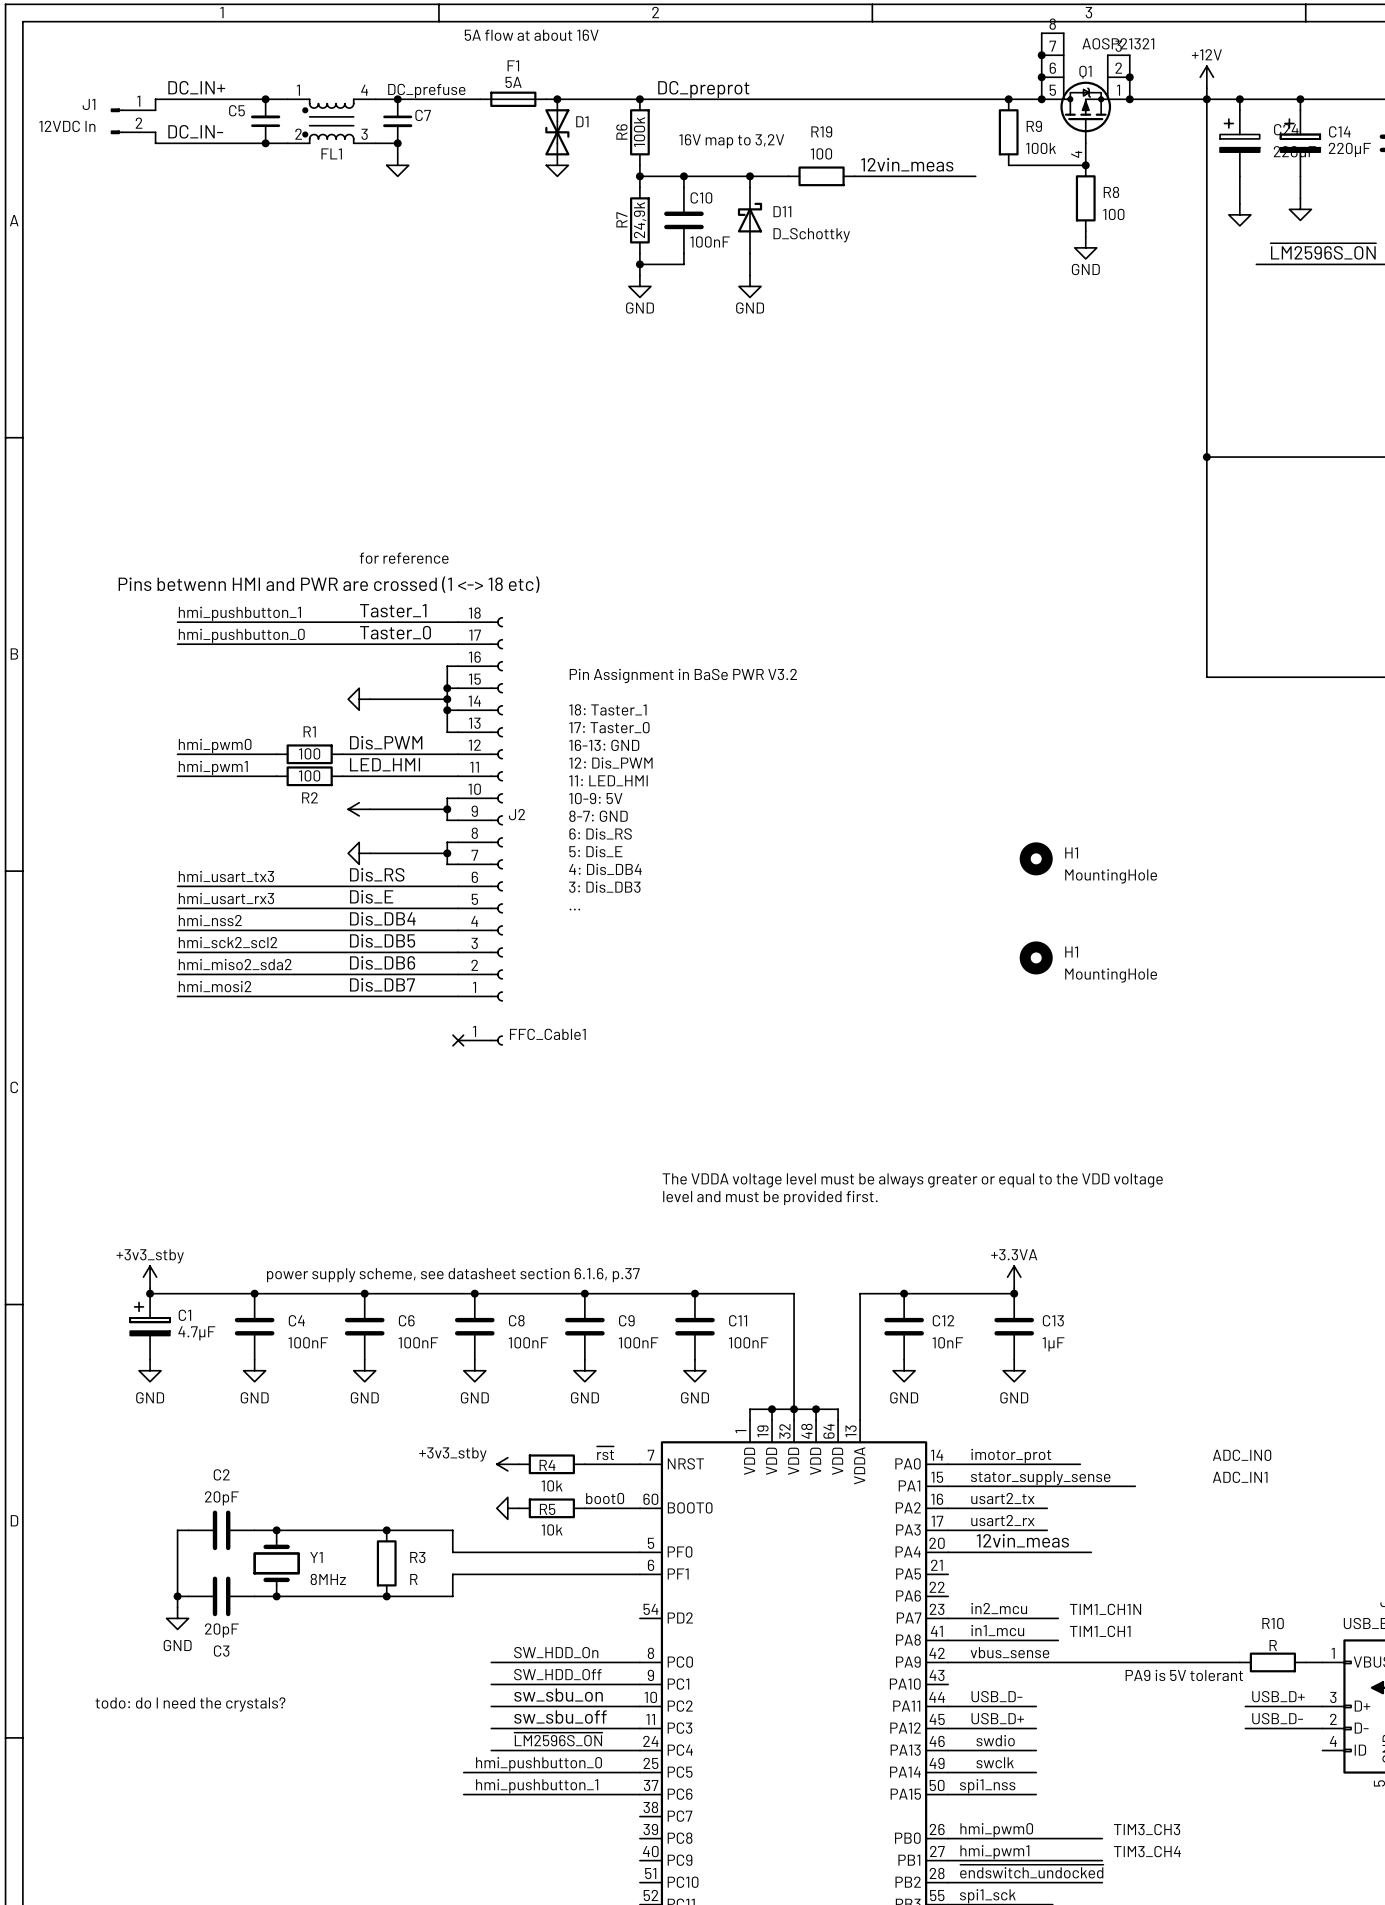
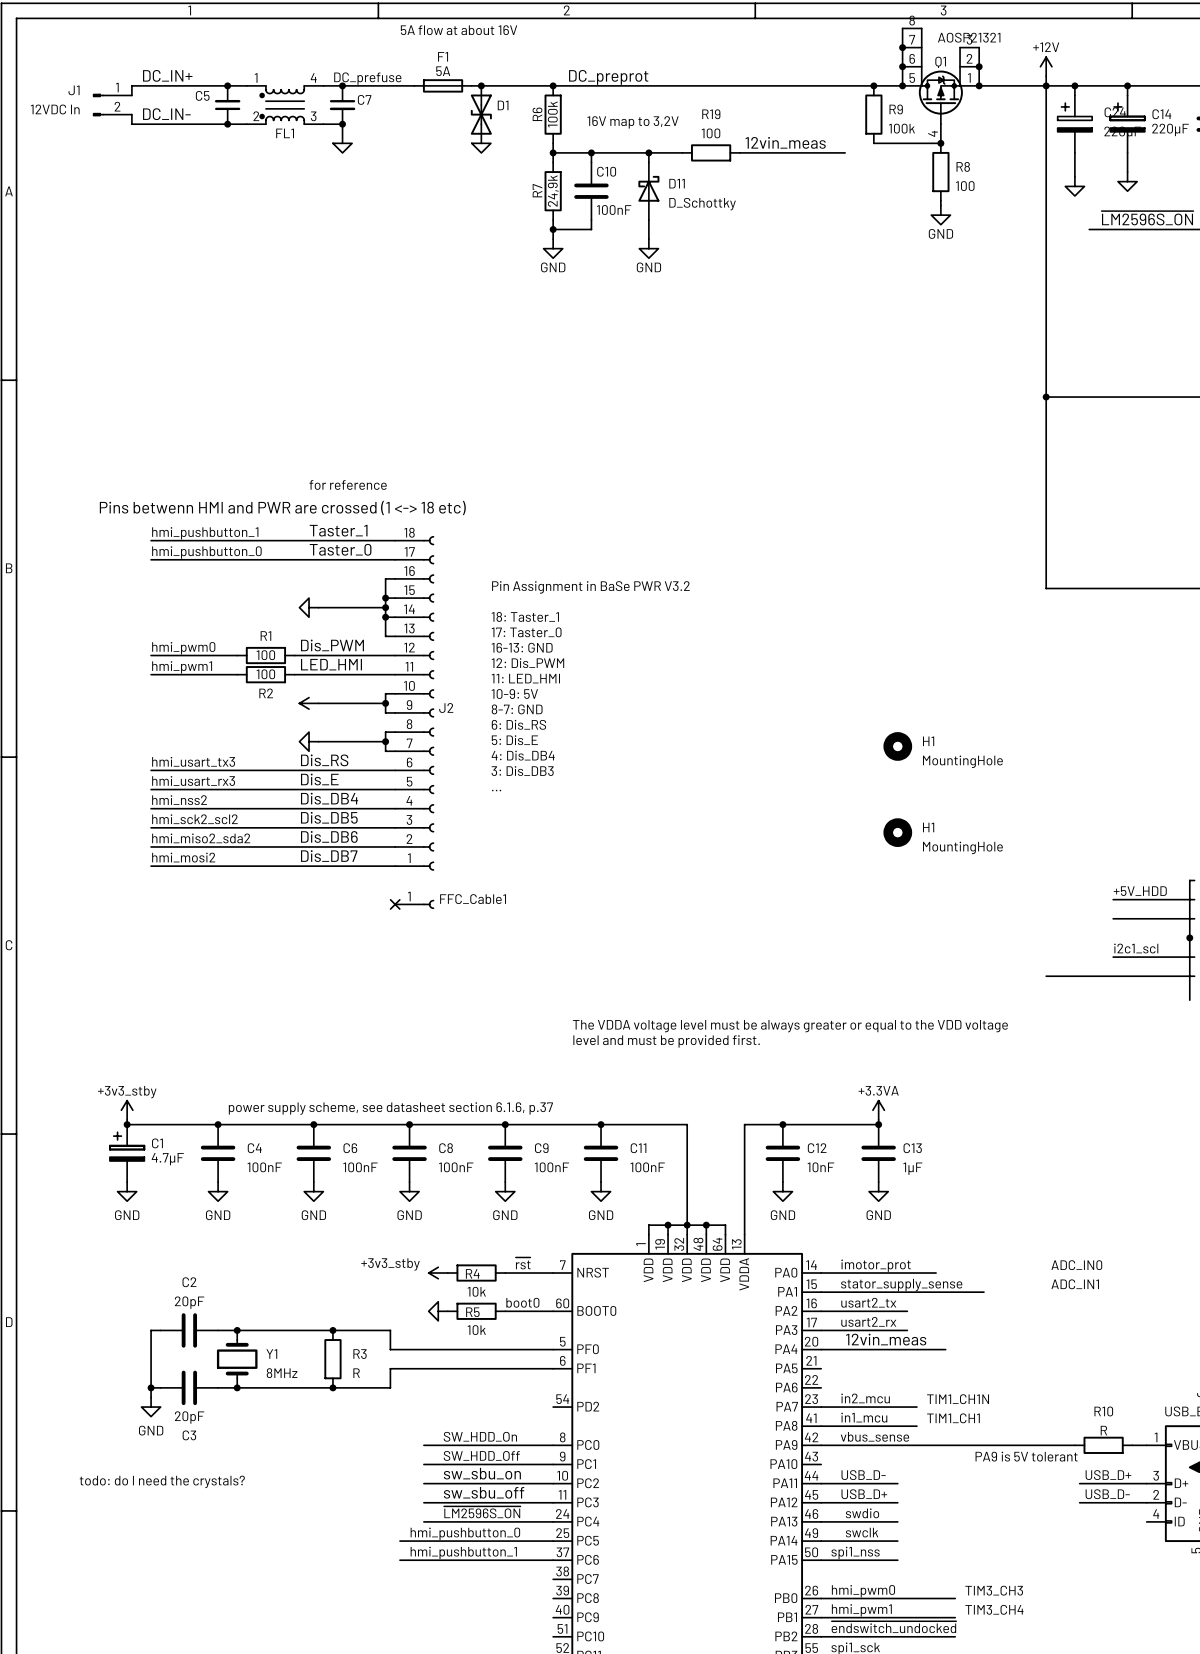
wire: none -> (1194, 880) (1189, 880) (1189, 1000)
label: none -> +5V_HDD (1140, 891)
wire: none -> (1113, 899) (1194, 899)
wire: none -> (1113, 918) (1194, 918)
junction: none -> (1189, 937)
label: none -> i2c1_scl (1136, 948)
wire: none -> (1113, 957) (1194, 957)
wire: none -> (1046, 976) (1194, 976)

